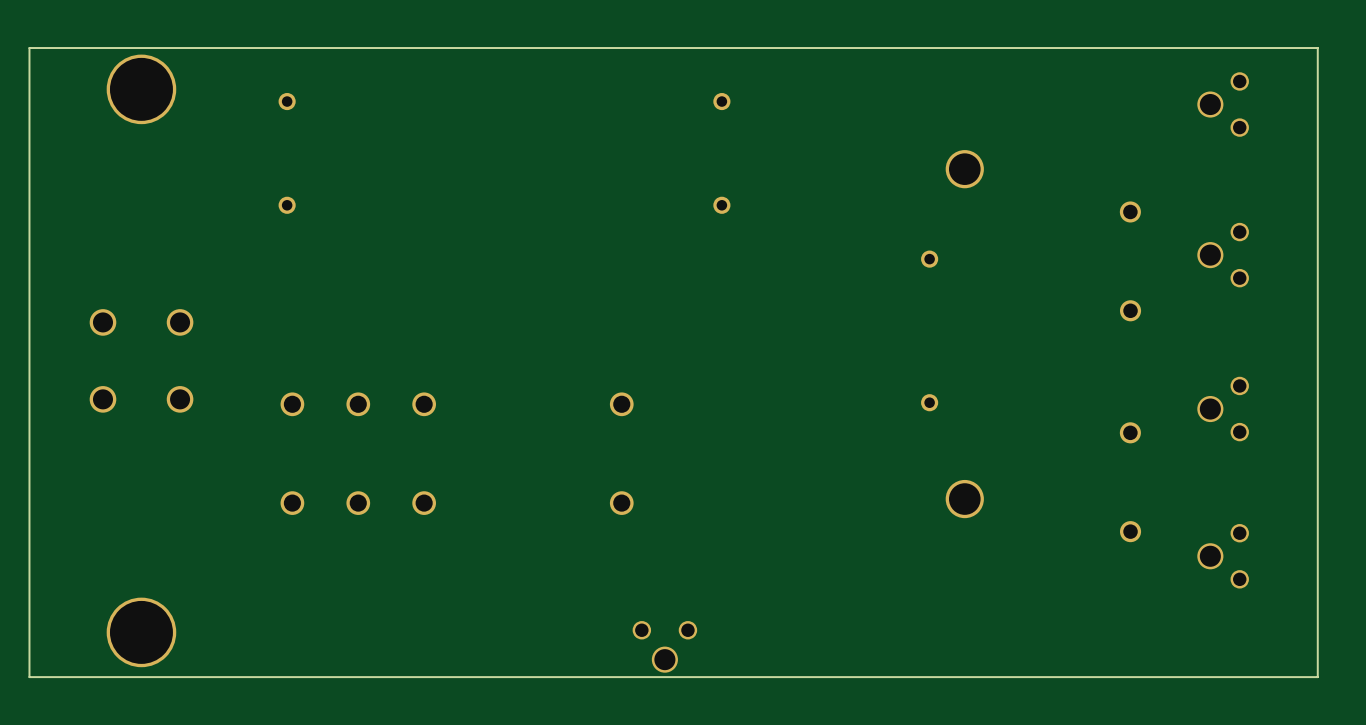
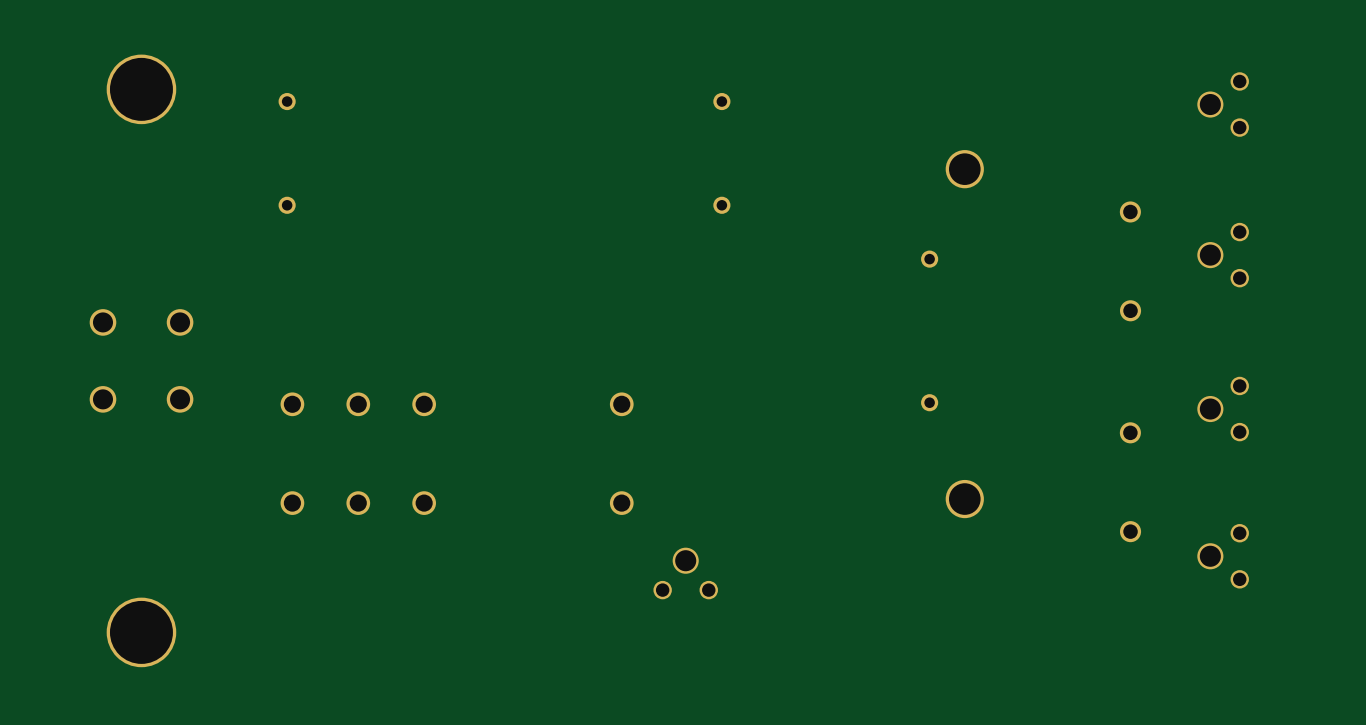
board edge: (1317, 48) (29, 48) (29, 677) (1317, 677) (1317, 48) -> none
part rotation: 0° (664, 646) -> 180° (685, 573)
part position: (664, 646) -> (685, 573)

